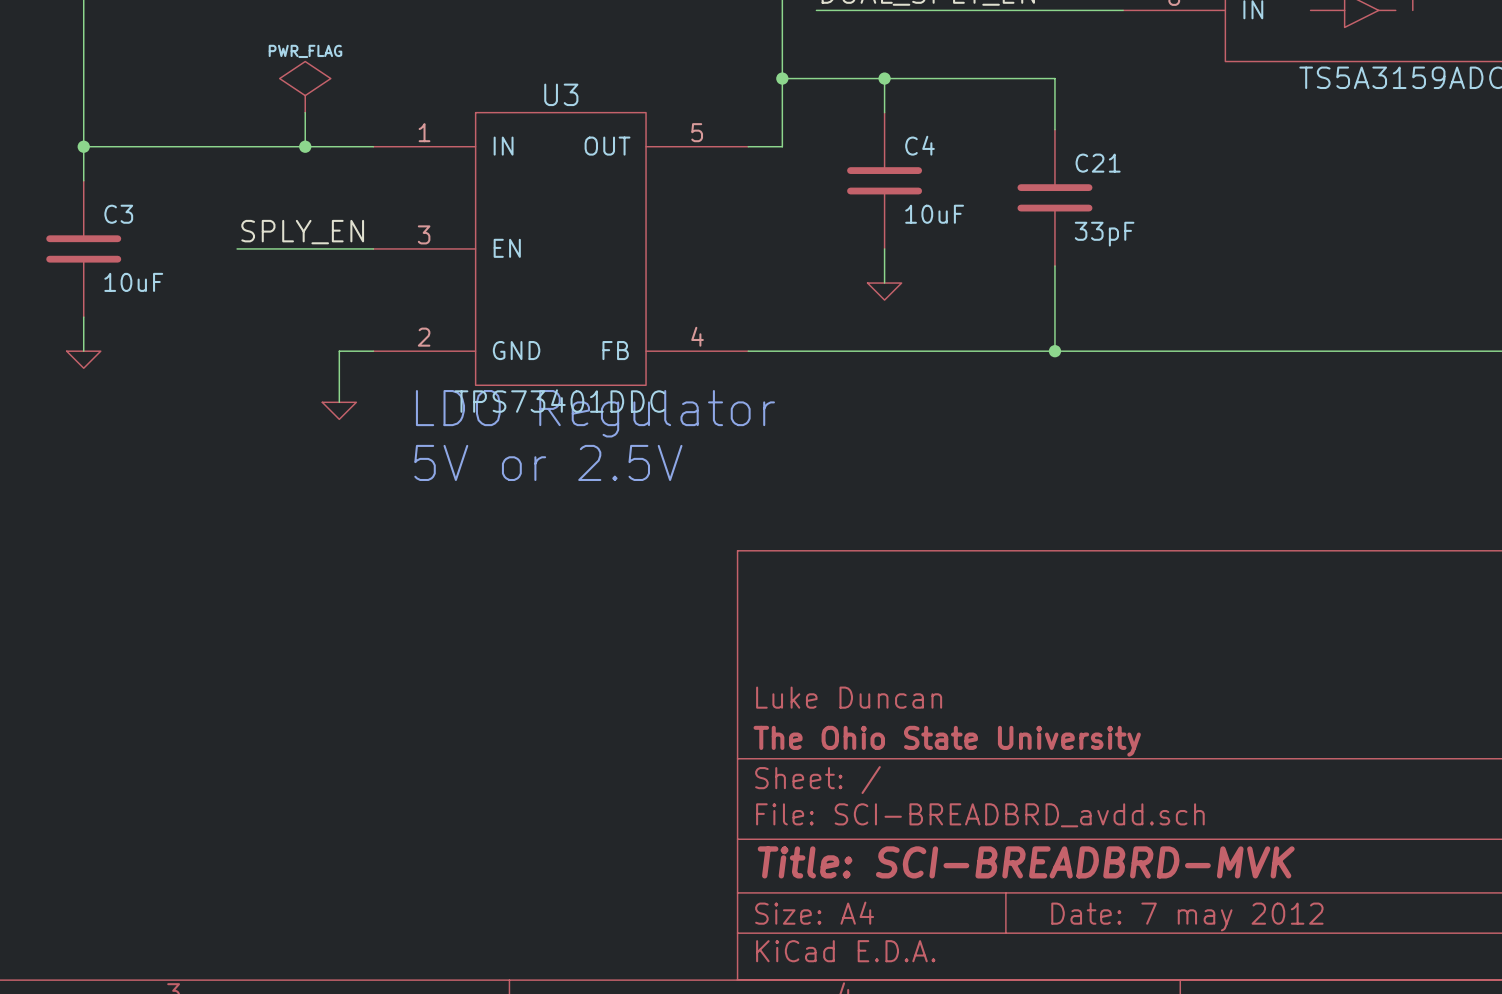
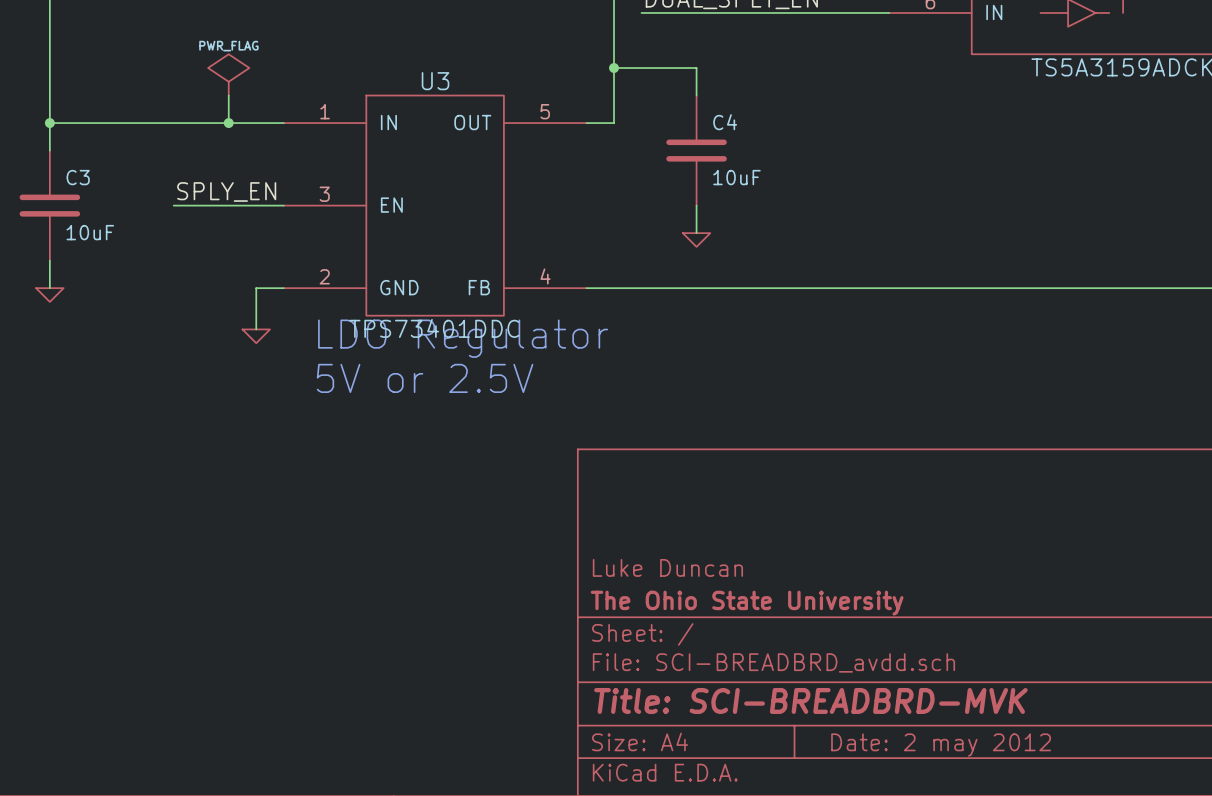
wire: (884, 78) (1054, 78) (1054, 129) -> none
junction: (884, 78) -> none
C21: 33pF (1054, 197) -> none
wire: (1054, 265) (1054, 351) -> none
junction: (1054, 351) -> none
title block: Date: 7 may 2012 (1187, 916) -> Date: 2 may 2012 (941, 745)

